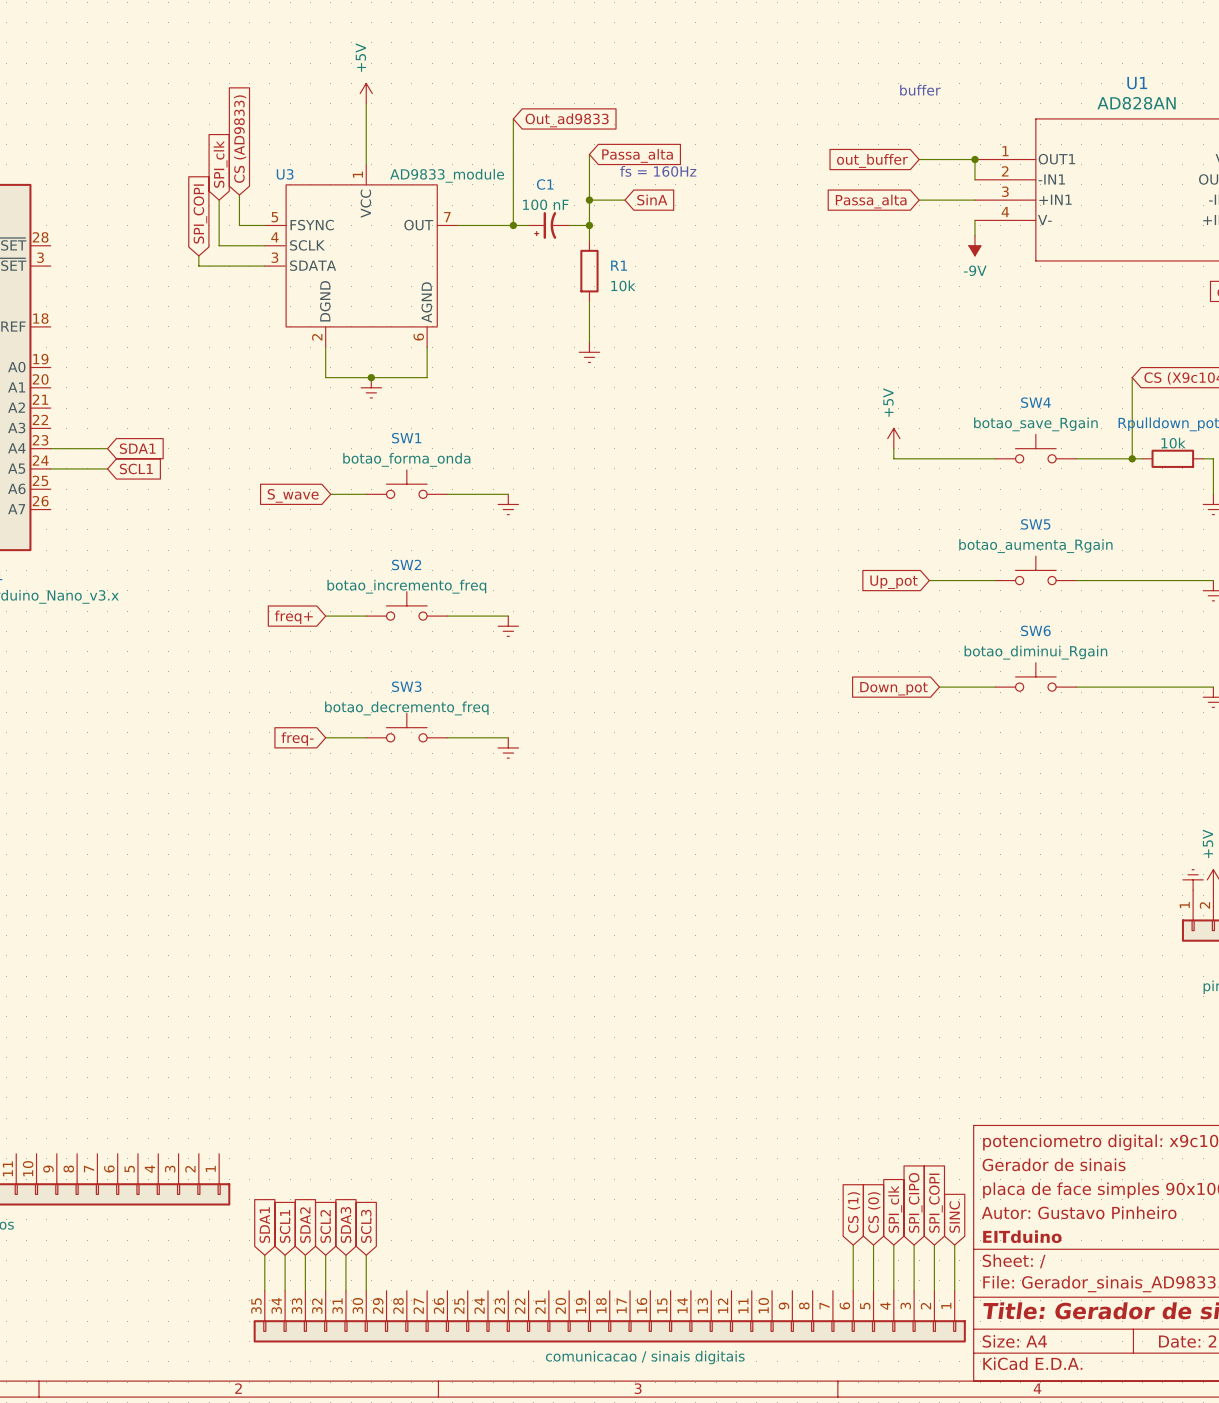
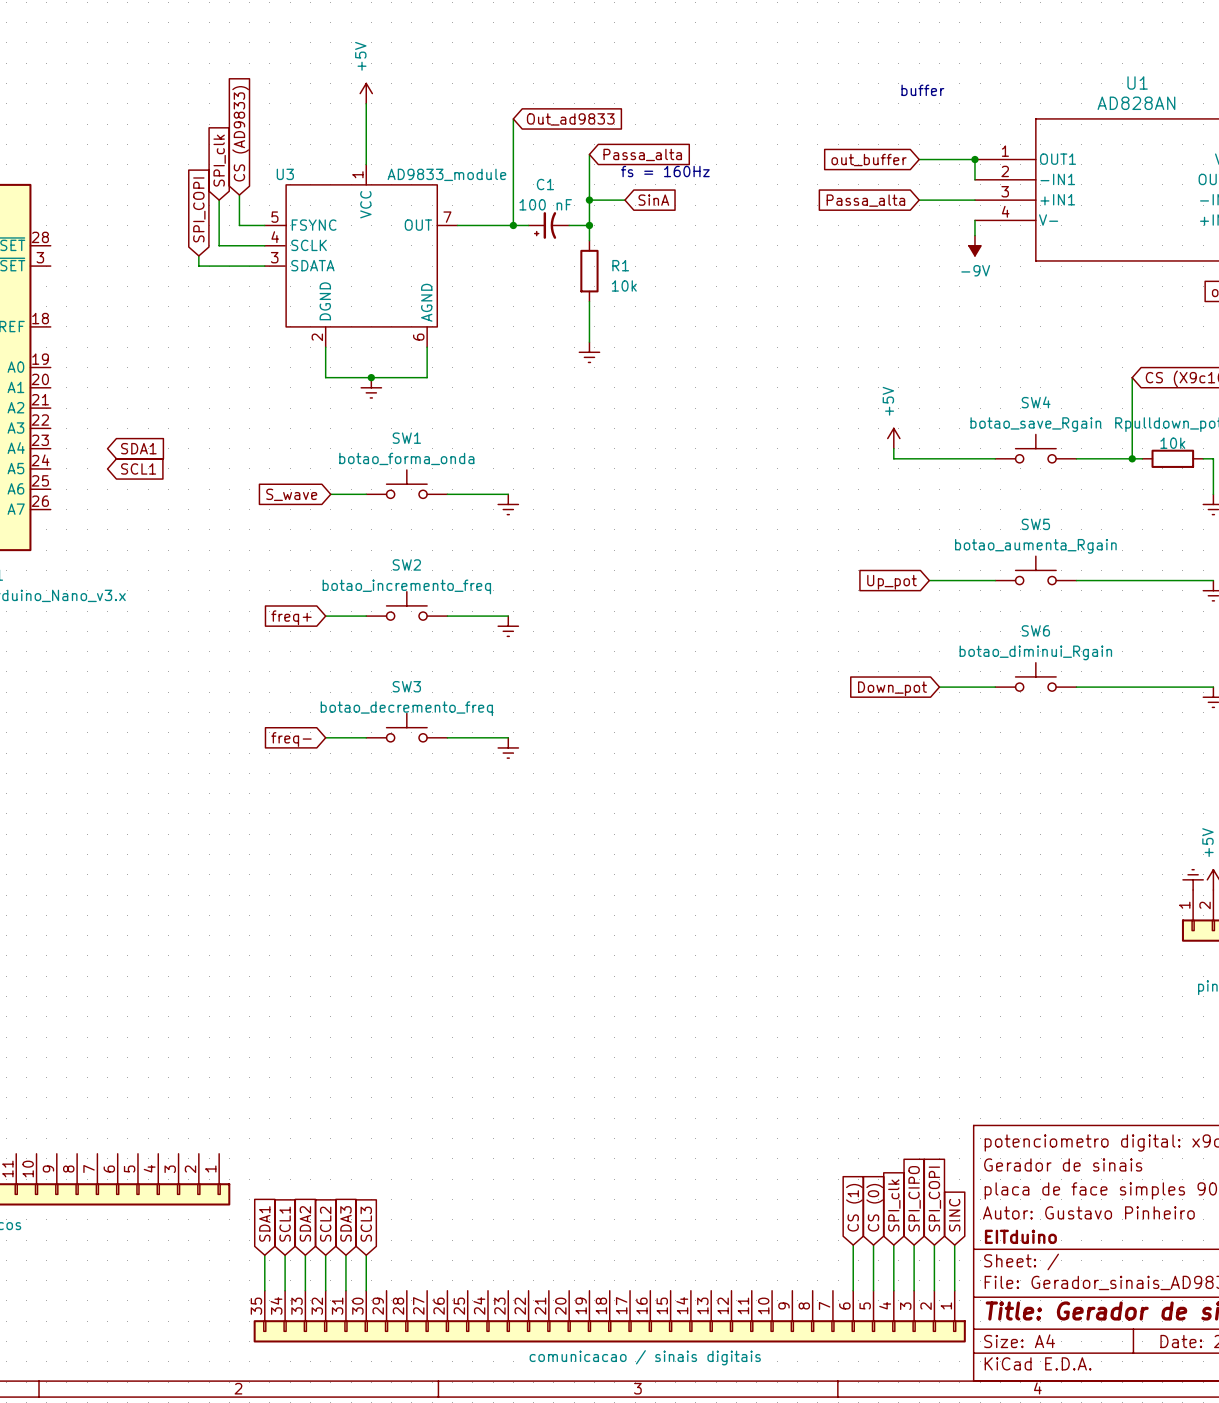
wire: (50, 448) (107, 448) -> none
wire: (50, 468) (107, 468) -> none

